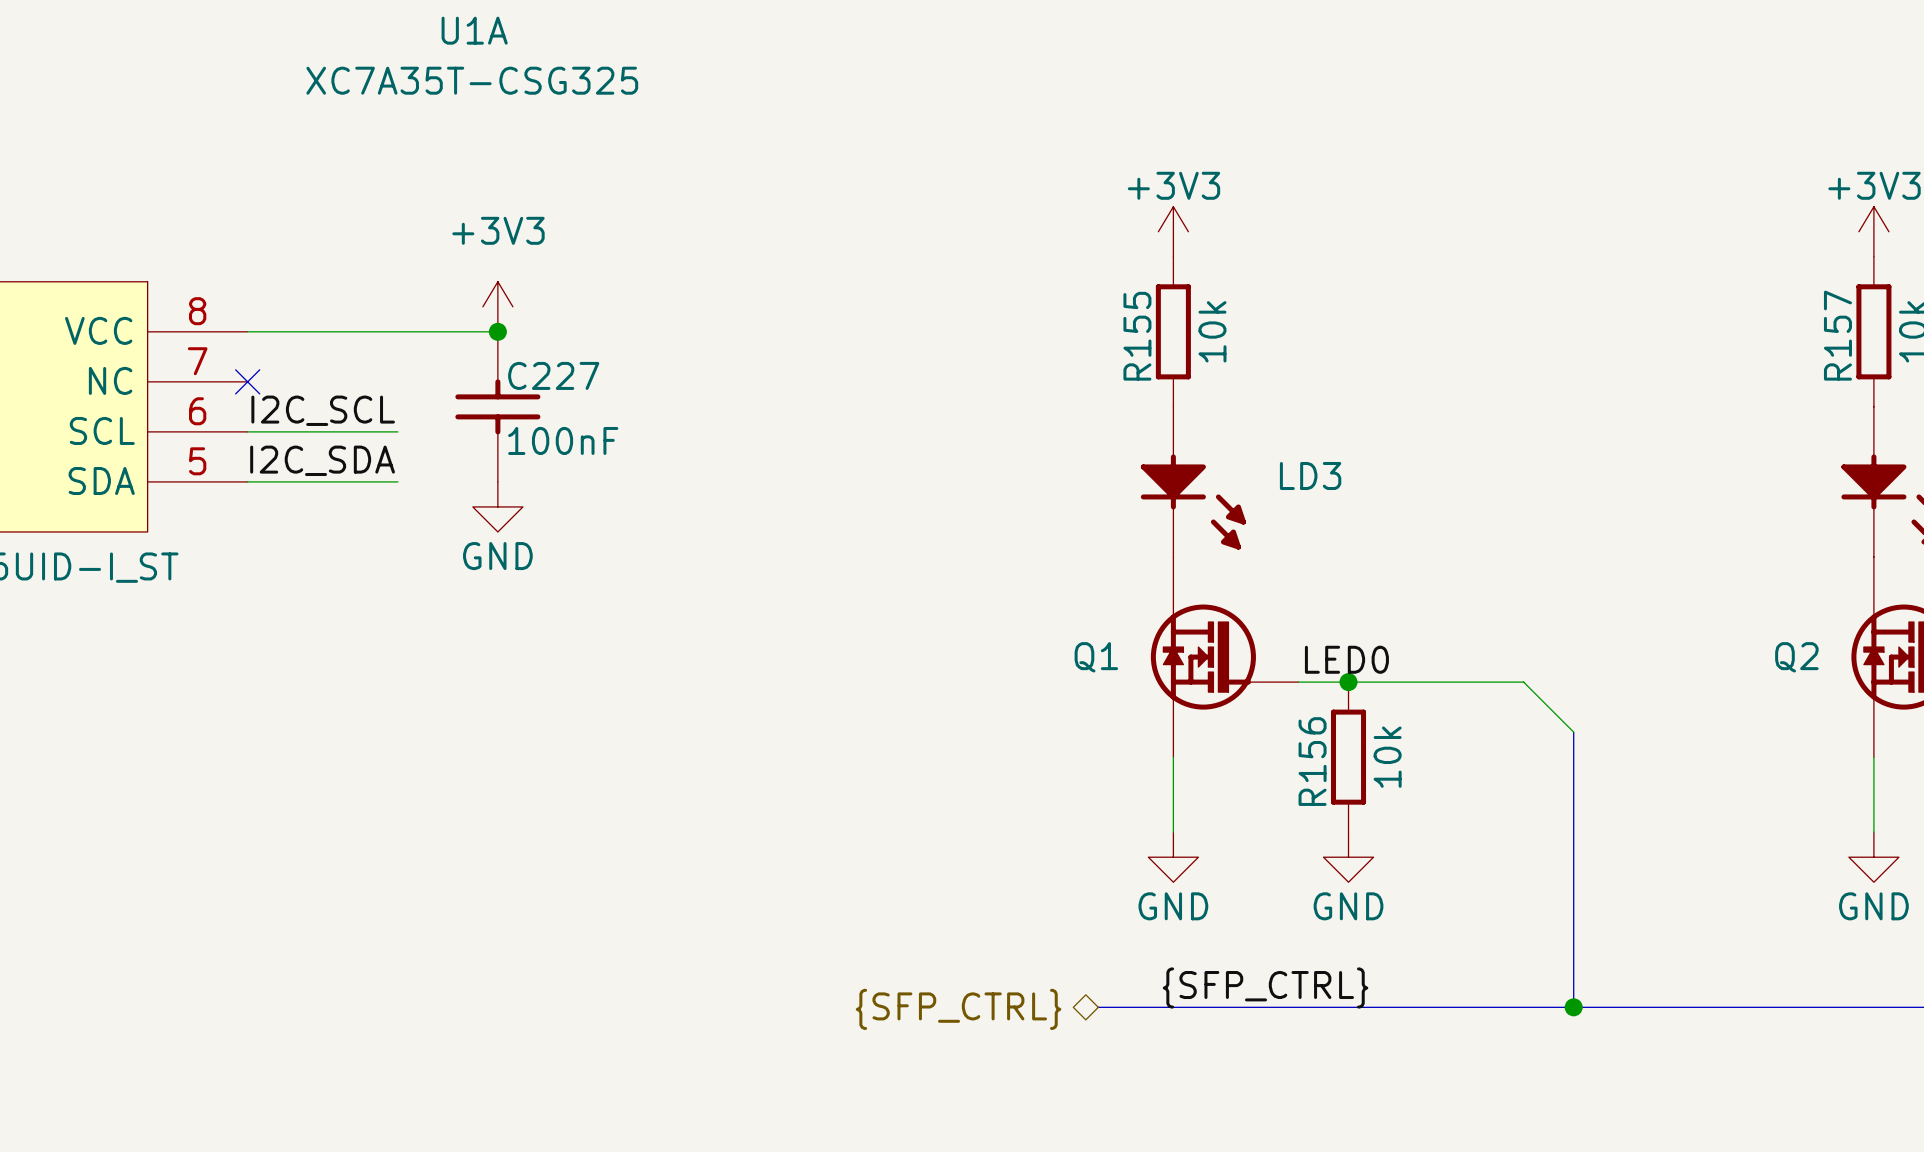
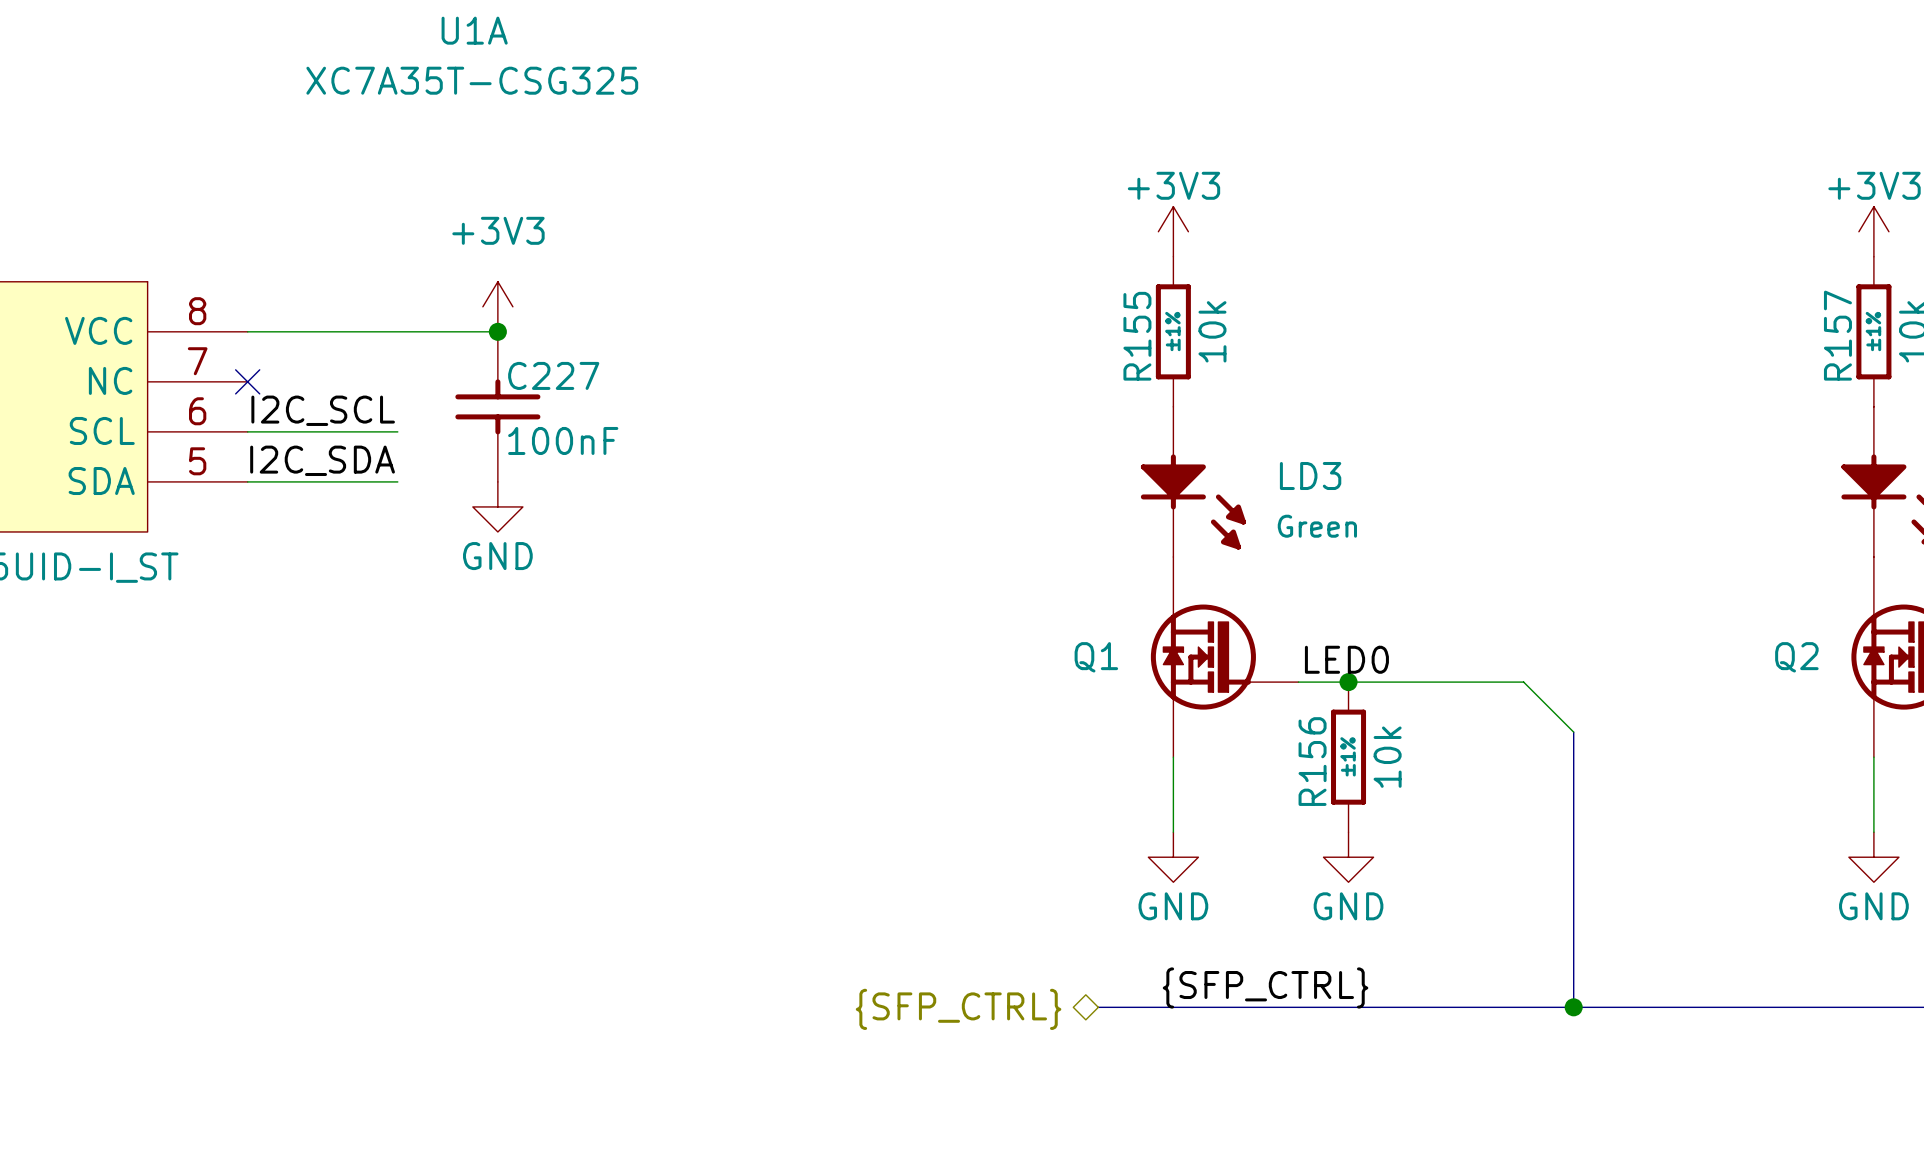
R155 text: none -> ±1% (1172, 331)
R157 text: none -> ±1% (1873, 331)
LD3 text: none -> Green (1317, 526)
R156 text: none -> ±1% (1348, 756)

